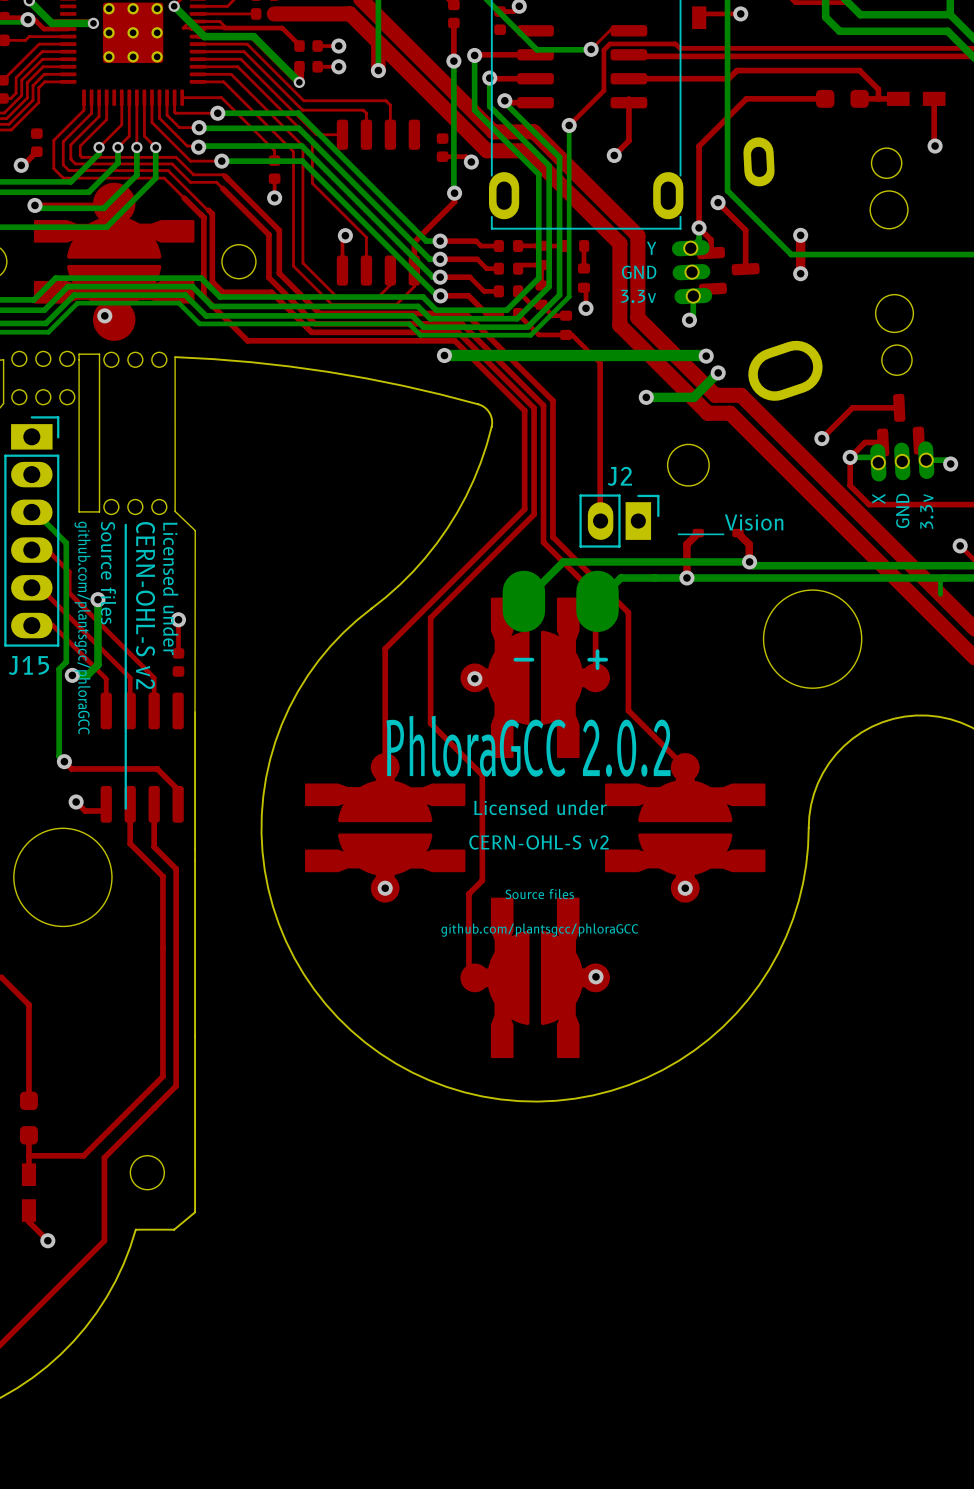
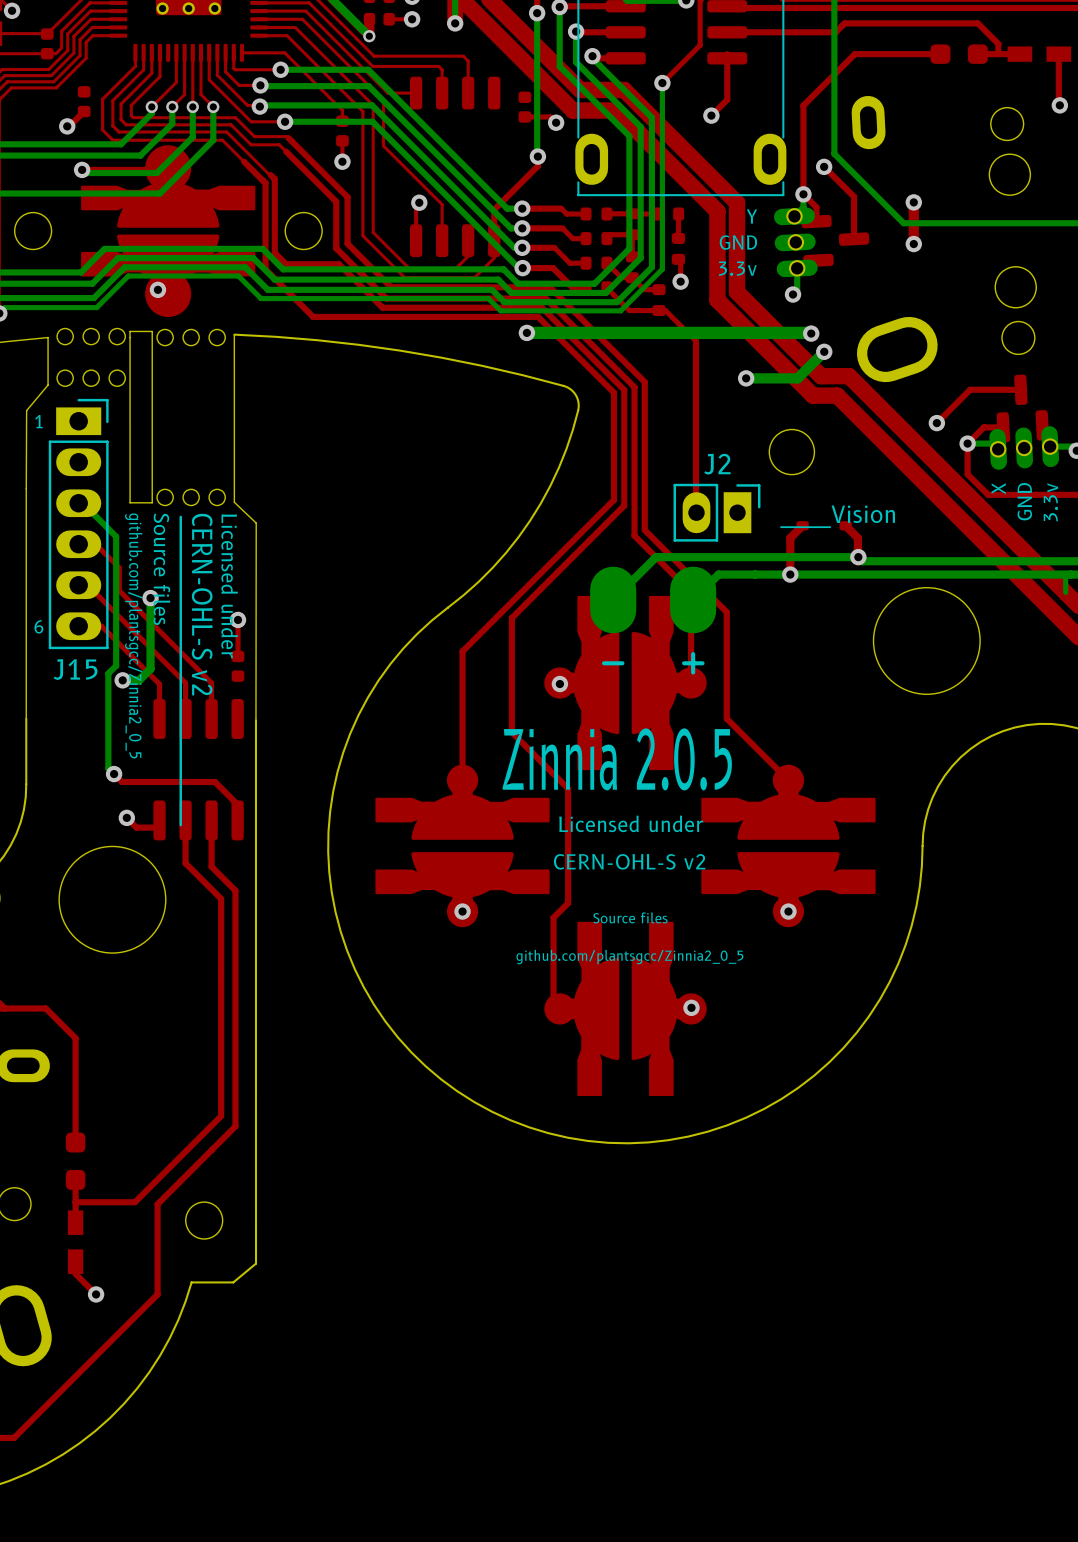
text: github.com/plantsgcc/phloraGCC (82, 628) -> github.com/plantsgcc/Zinnia2_0_5 (133, 635)
text: PhloraGCC 2.0.2 (528, 746) -> Zinnia 2.0.5 (617, 759)
text: github.com/plantsgcc/phloraGCC (539, 930) -> github.com/plantsgcc/Zinnia2_0_5 (629, 957)

